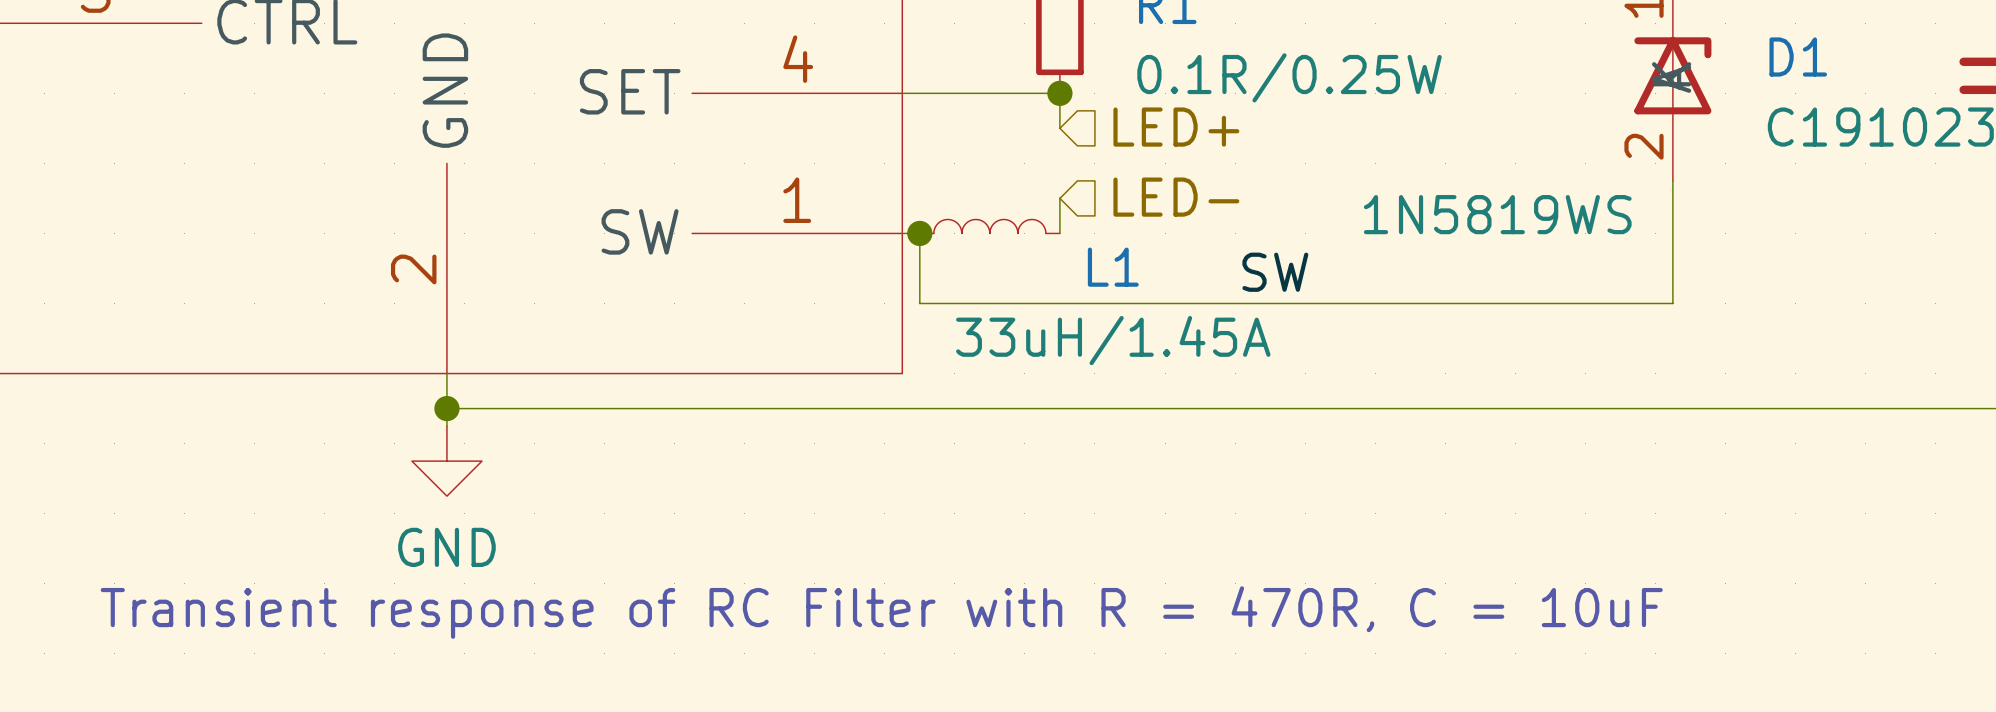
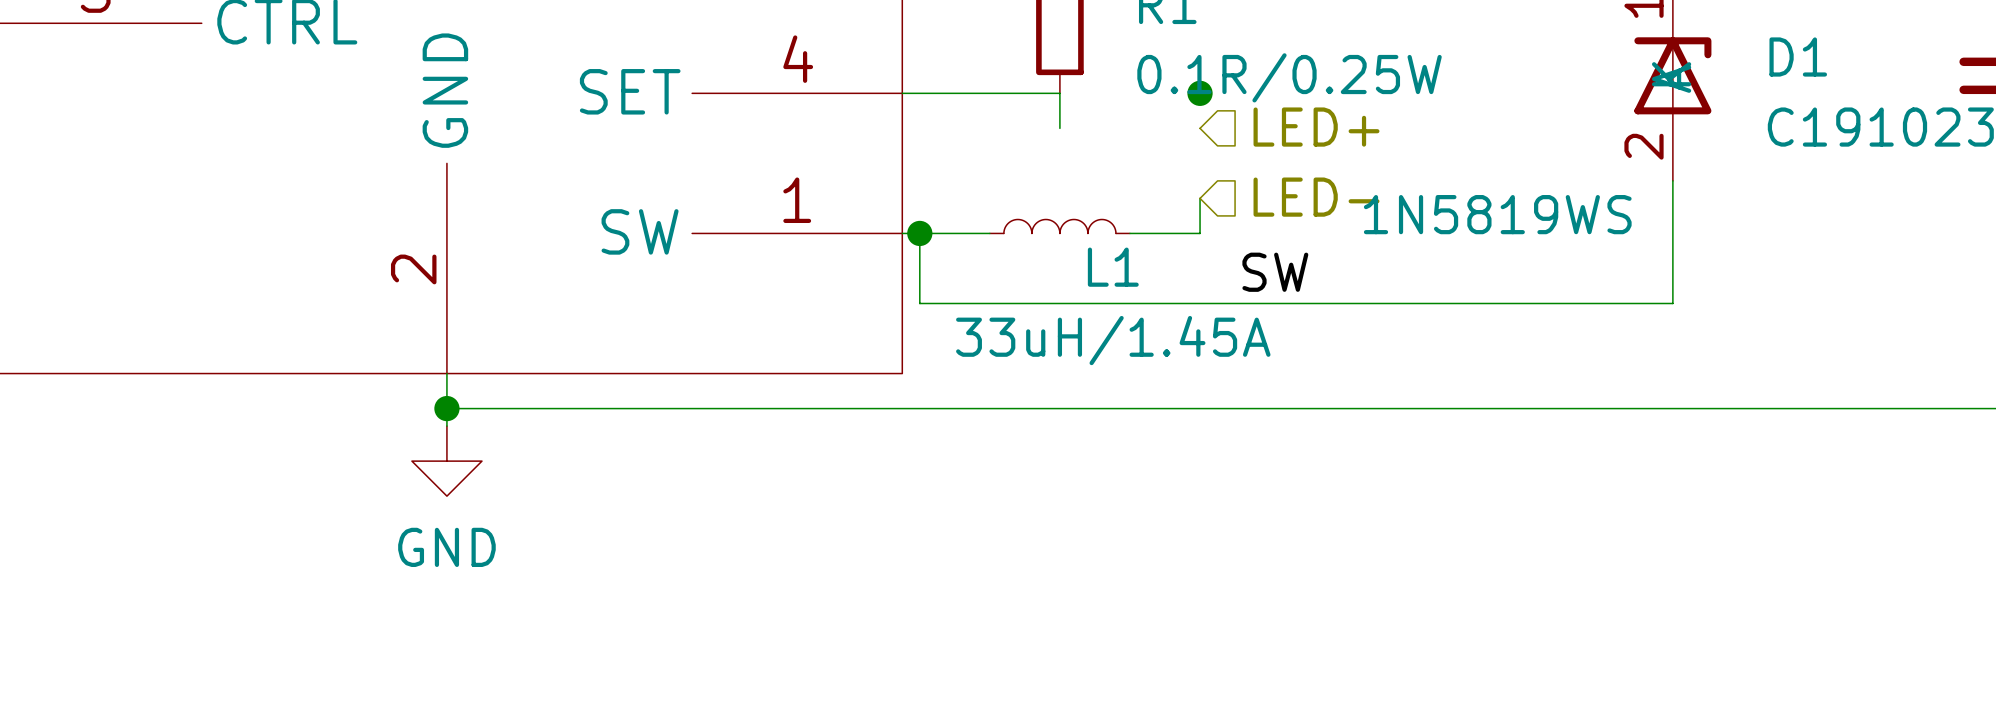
junction: (1059, 93) -> none
junction: none -> (1200, 93)
hierarchical label position: LED+ (1176, 127) -> LED+ (1316, 127)
hierarchical label position: LED- (1176, 197) -> LED- (1316, 197)
wire: (1059, 198) (1059, 233) -> none
wire: none -> (1200, 198) (1200, 233) (1129, 233)
L1 position: (989, 226) -> (1059, 226)
wire: none -> (919, 233) (989, 233)
text: Transient response of RC Filter with R = 470R, C = 10uF (881, 612) -> none

